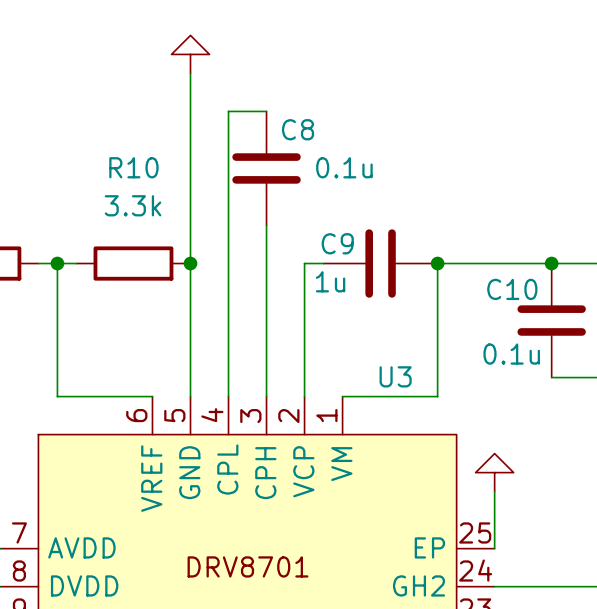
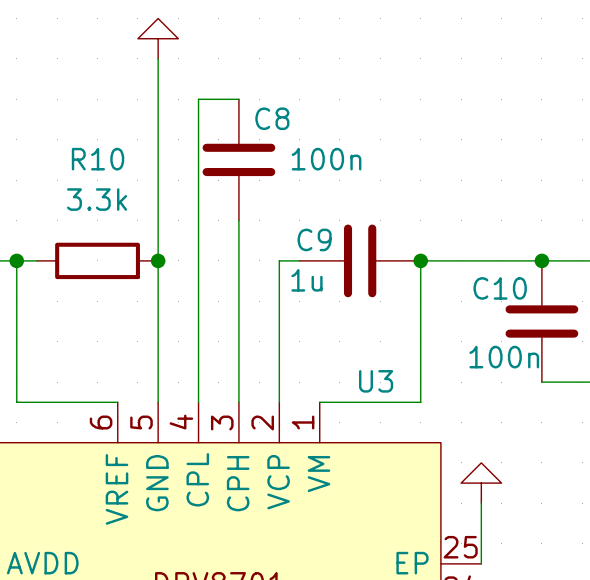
C8 value: 0.1u (344, 167) -> 100n (326, 159)
C10 value: 0.1u (511, 354) -> 100n (504, 357)

